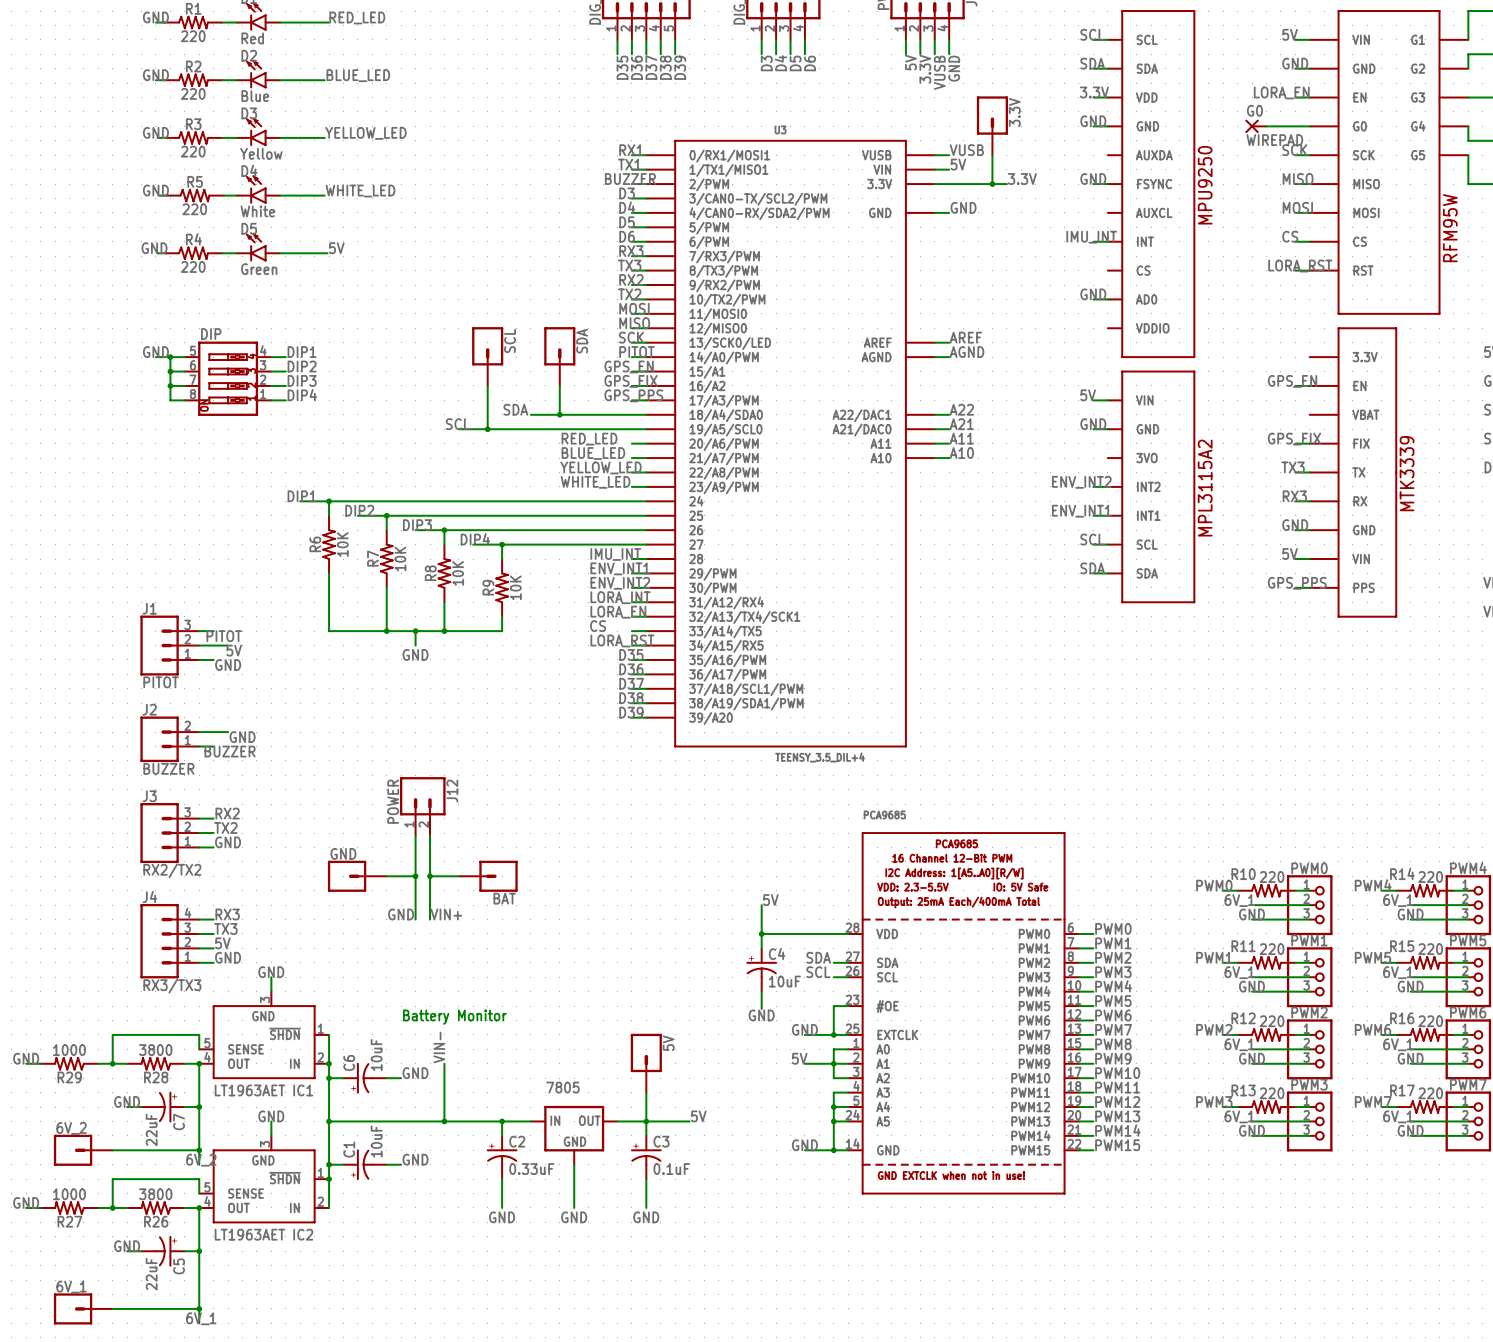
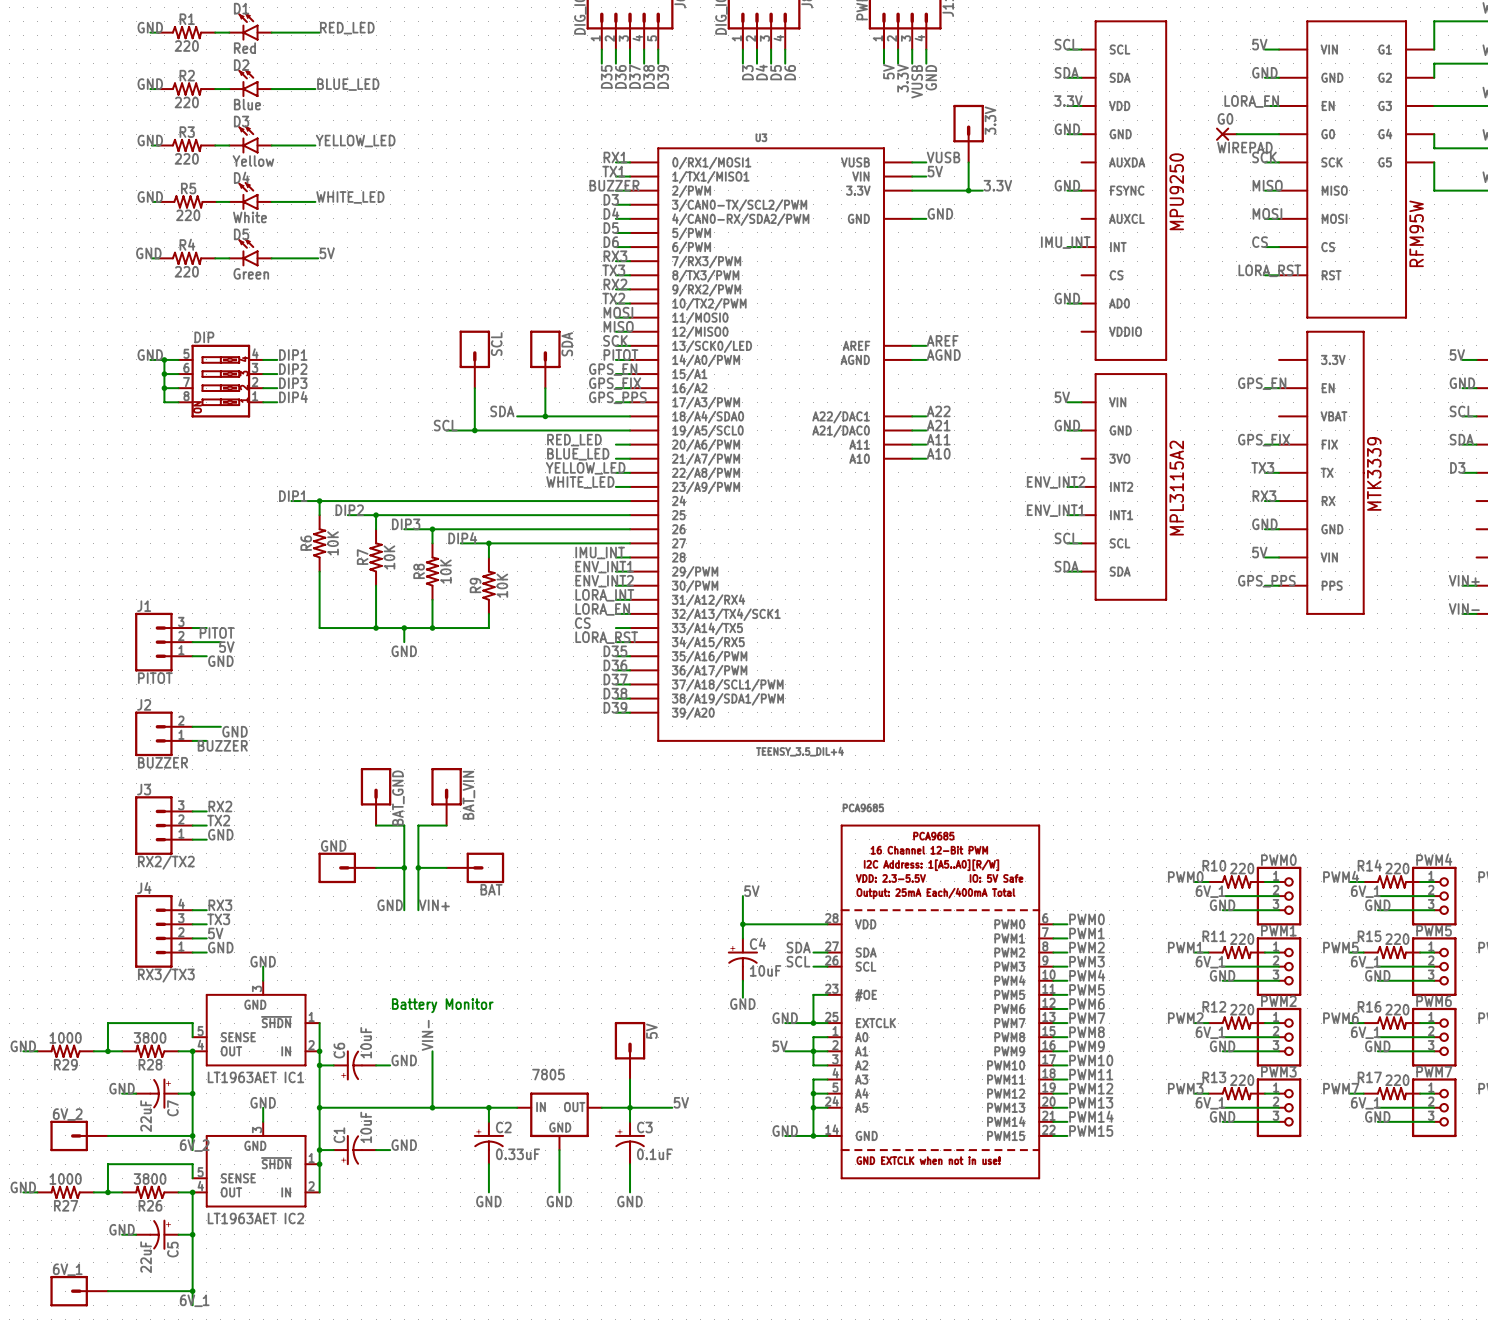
BAT_GND: none -> (376, 796)
BAT_VIN: none -> (446, 796)
J12: POWER (422, 806) -> none
wire: none -> (376, 825) (404, 825) (404, 828)
wire: none -> (446, 825) (418, 825) (418, 828)

